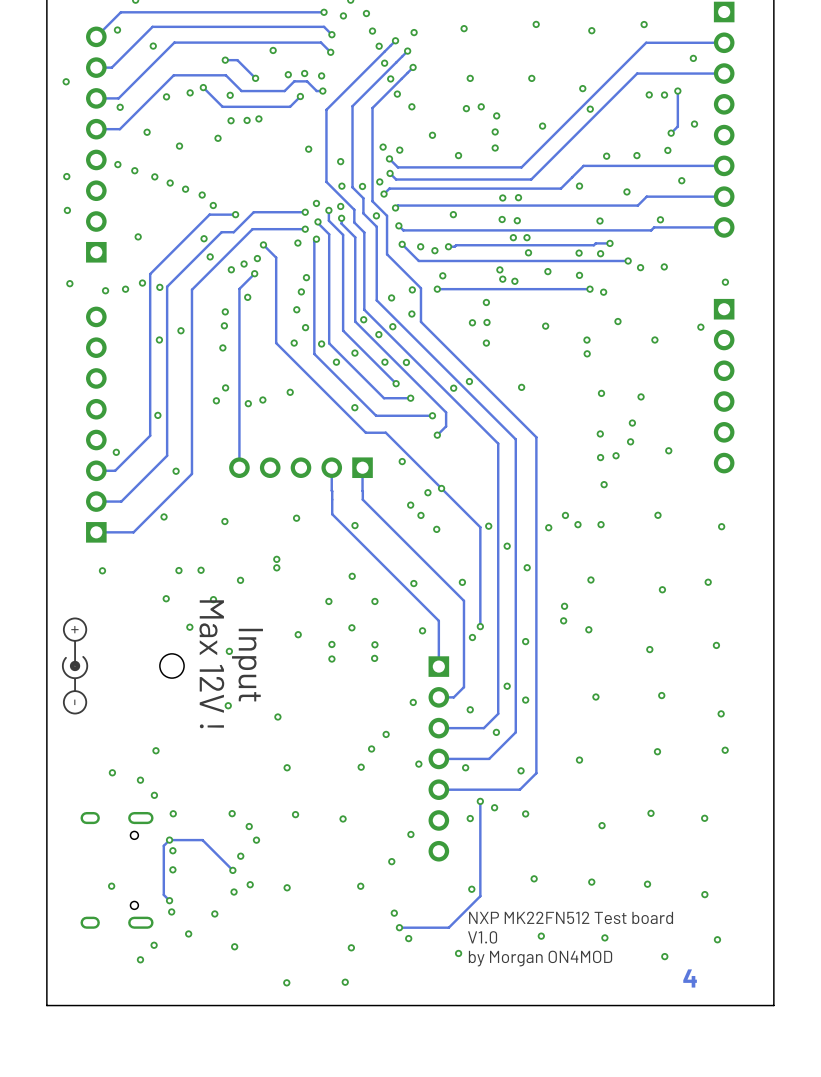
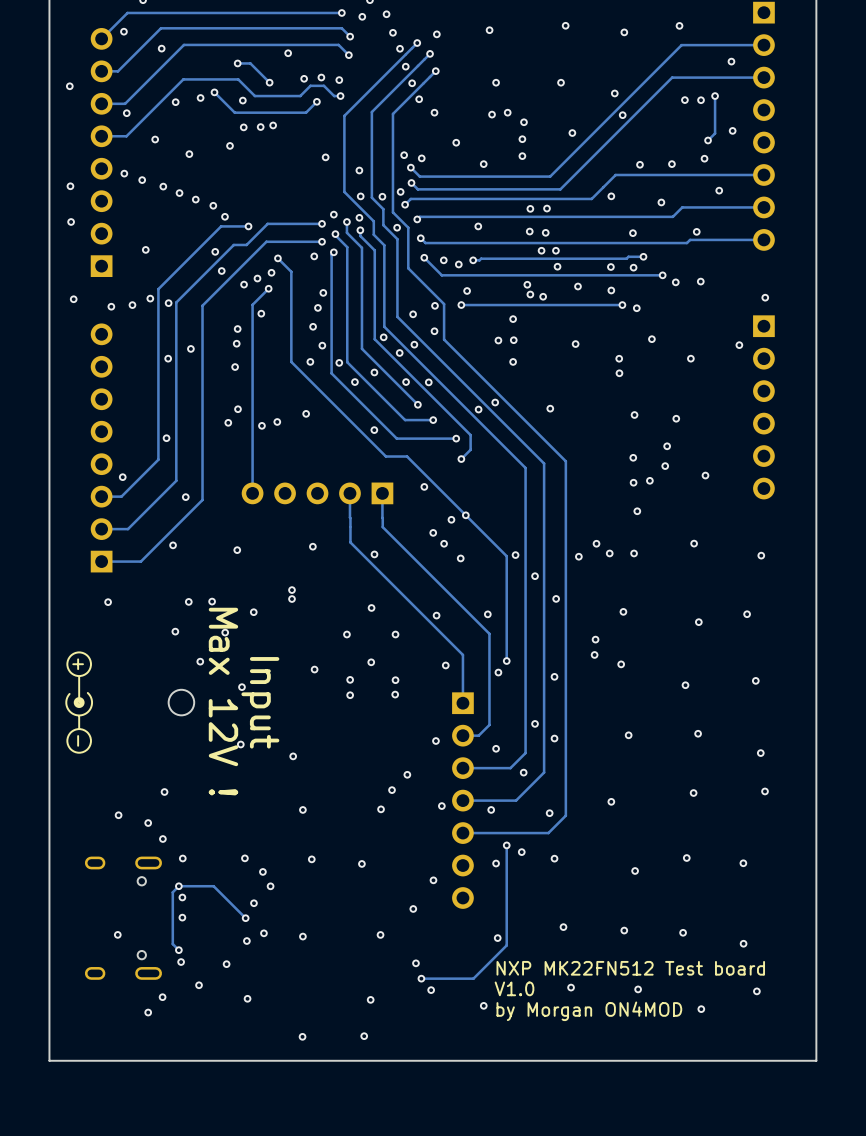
text: 4 (690, 978) -> none

